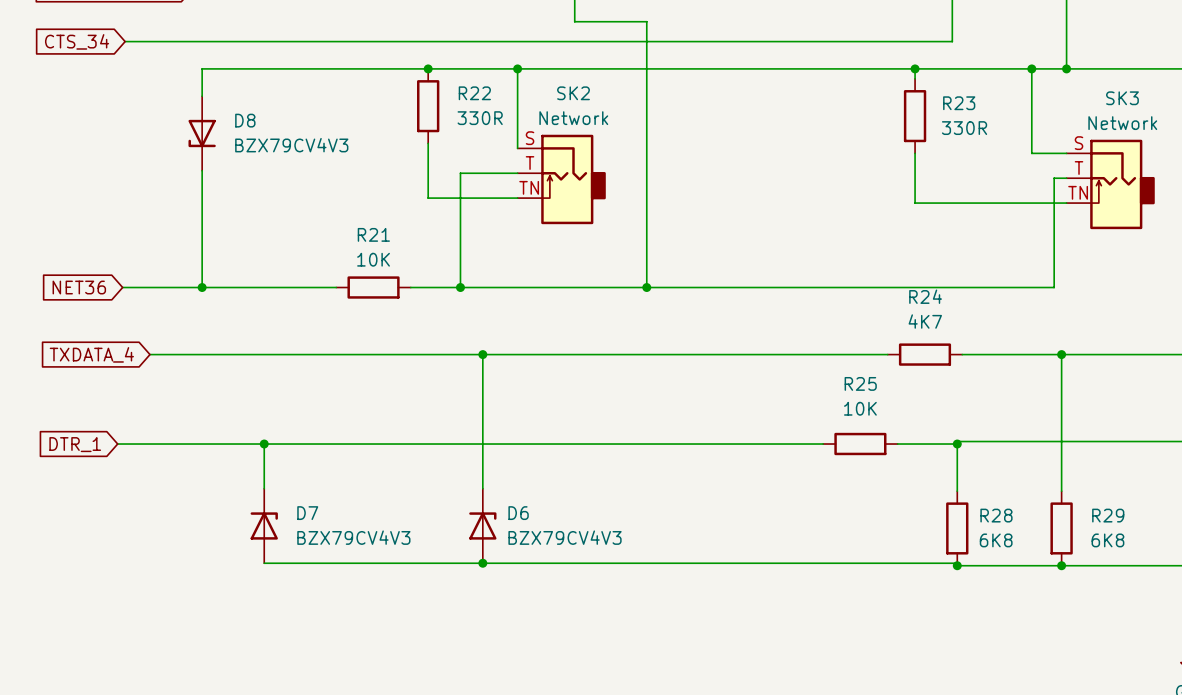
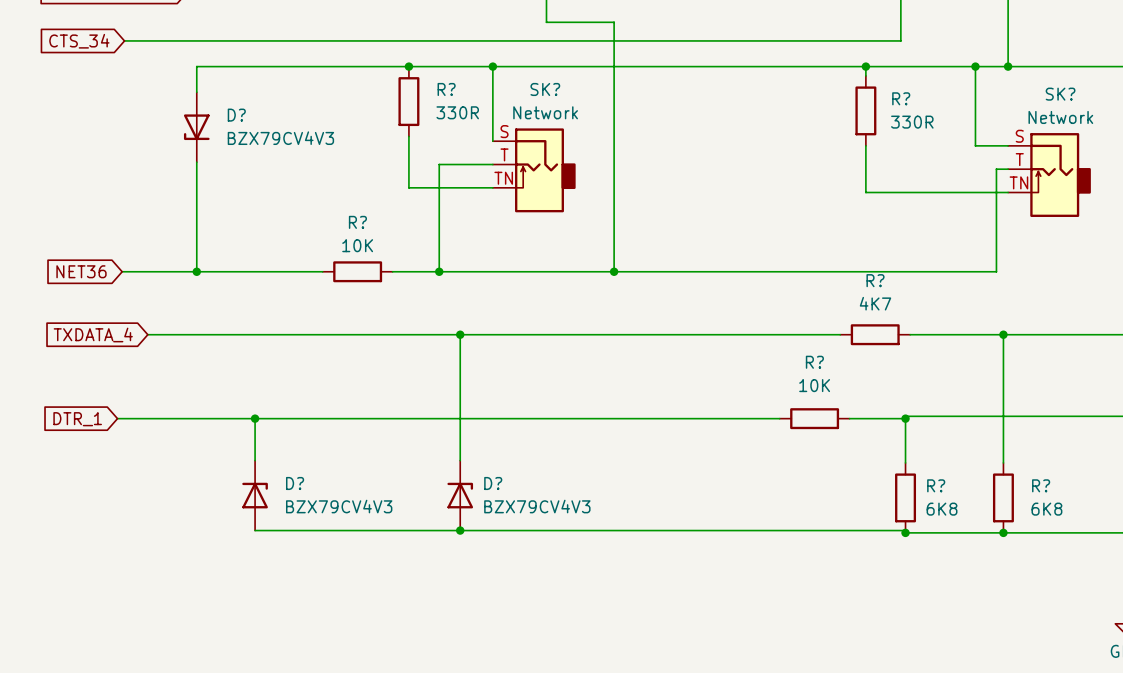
R22 name: R22 (474, 93) -> R? (446, 89)
SK2 name: SK2 (573, 93) -> SK? (545, 89)
SK3 name: SK3 (1122, 98) -> SK? (1060, 94)
R23 name: R23 (959, 103) -> R? (901, 98)
D8 name: D8 (245, 120) -> D? (236, 115)
R21 name: R21 (373, 234) -> R? (357, 222)
R24 name: R24 (925, 296) -> R? (875, 280)
R25 name: R25 (860, 383) -> R? (814, 362)
D7 name: D7 (307, 513) -> D? (295, 483)
D6 name: D6 (518, 513) -> D? (493, 483)
R28 name: R28 (996, 515) -> R? (936, 485)
R29 name: R29 (1108, 515) -> R? (1041, 485)

